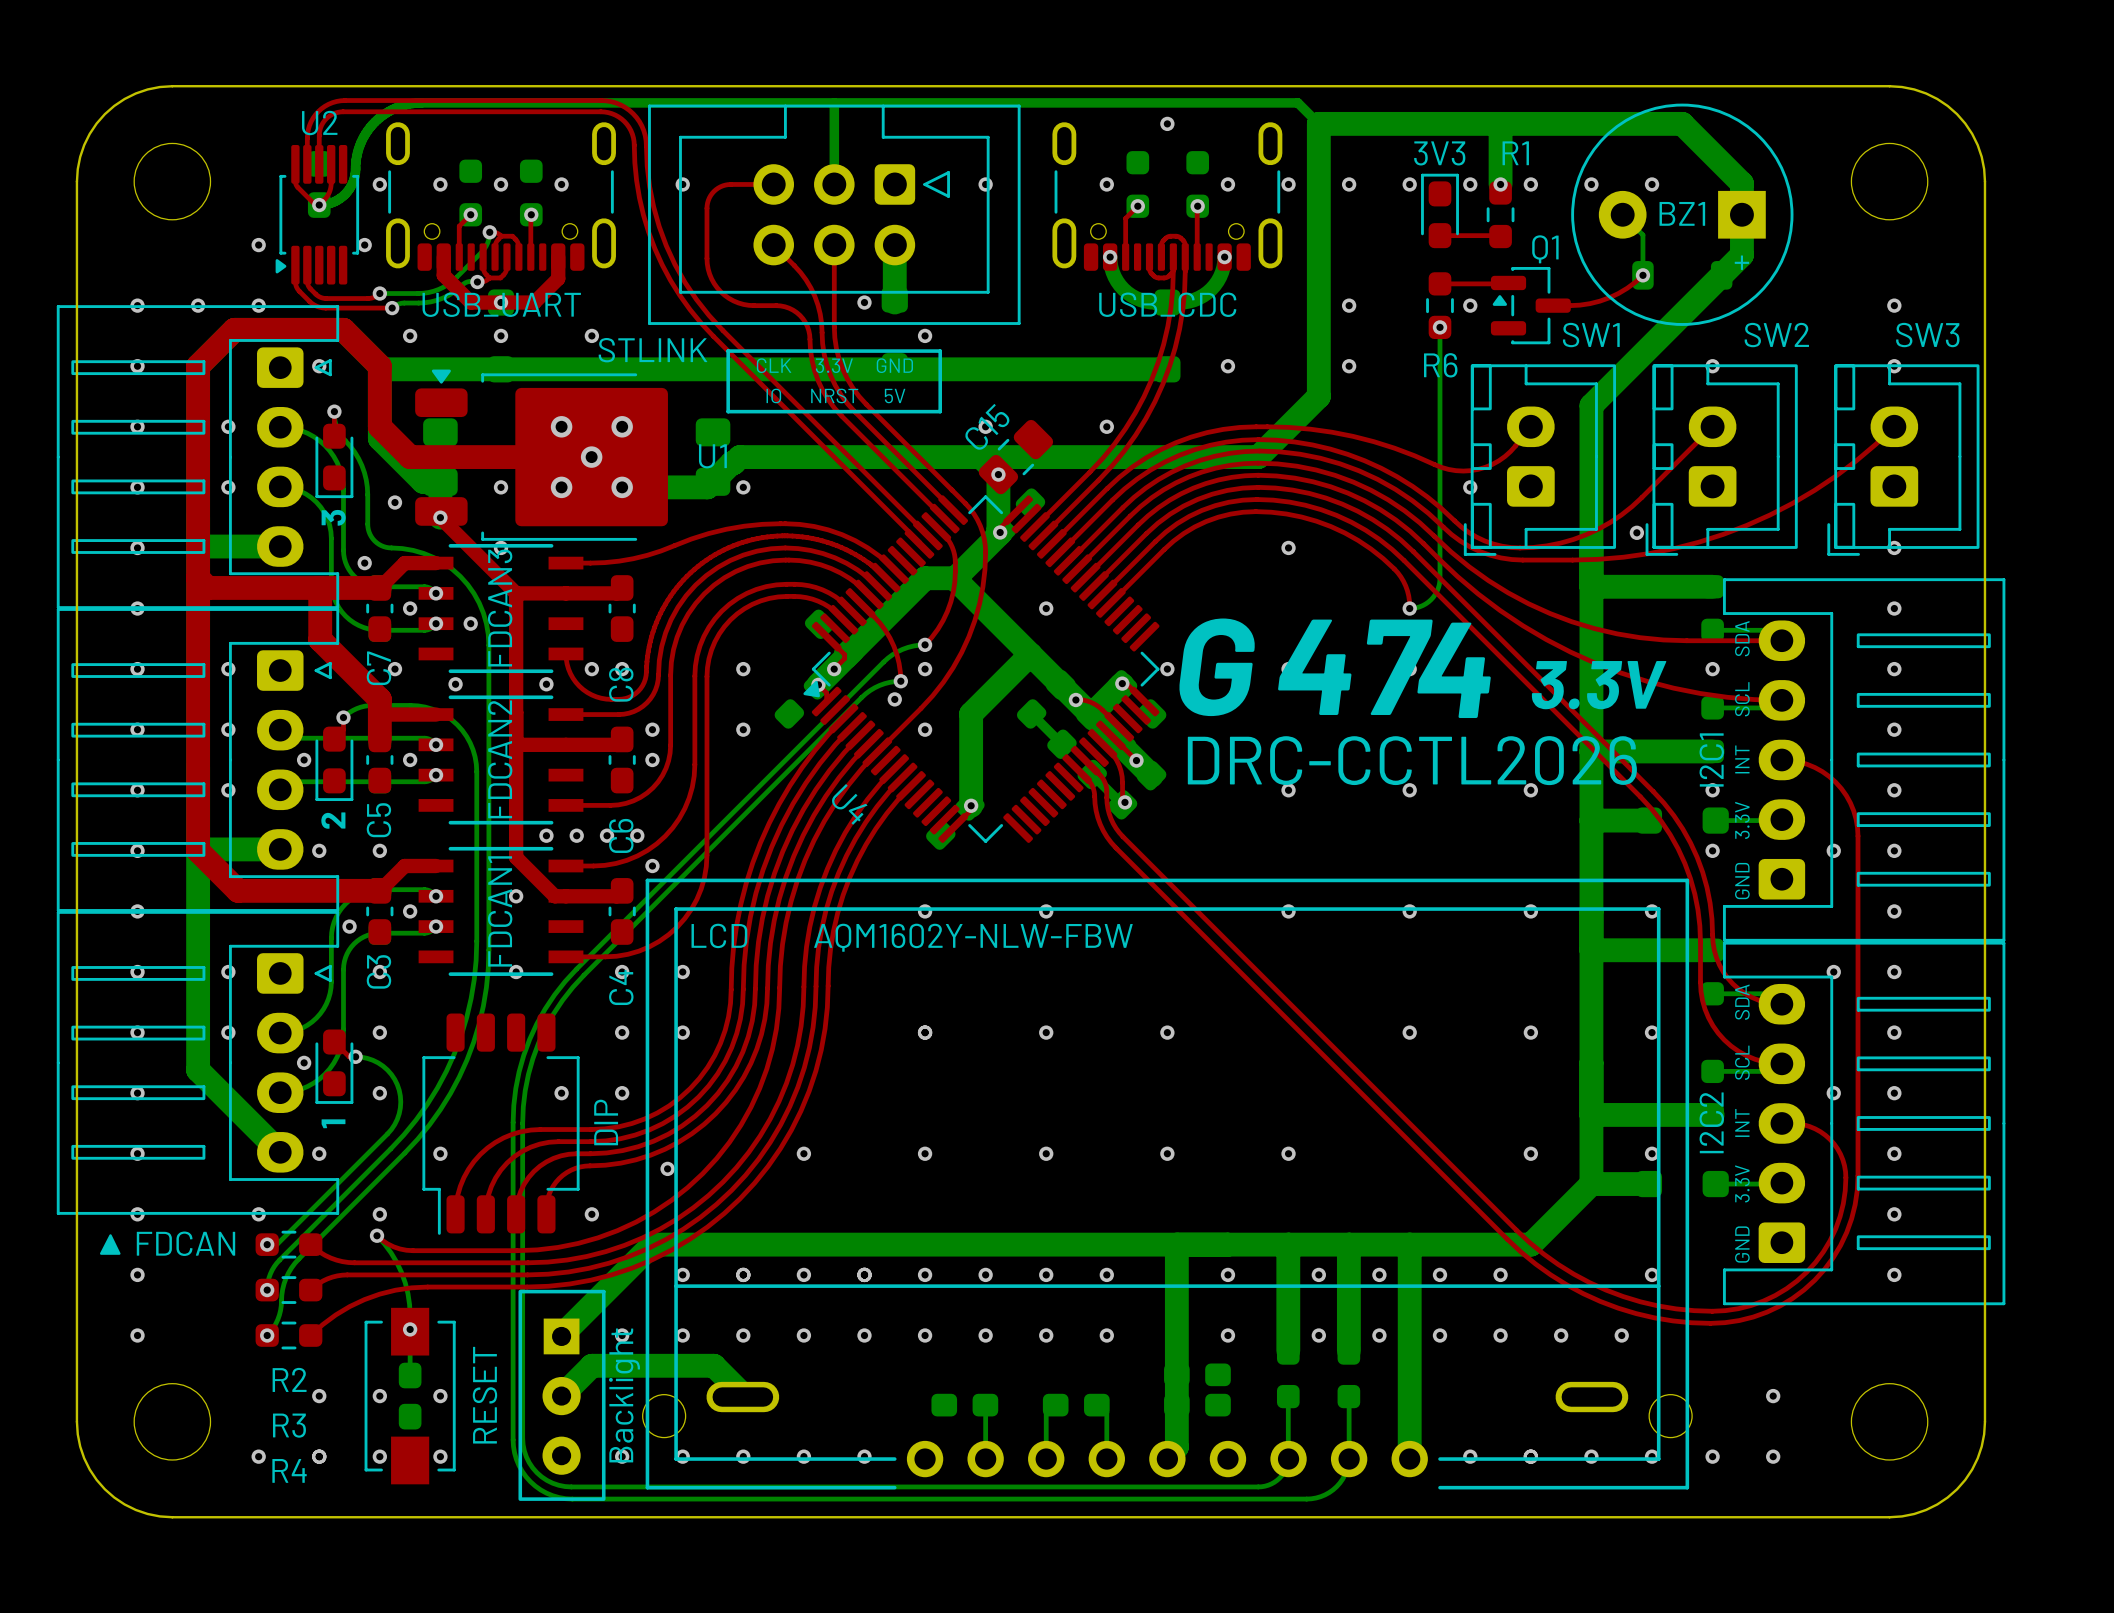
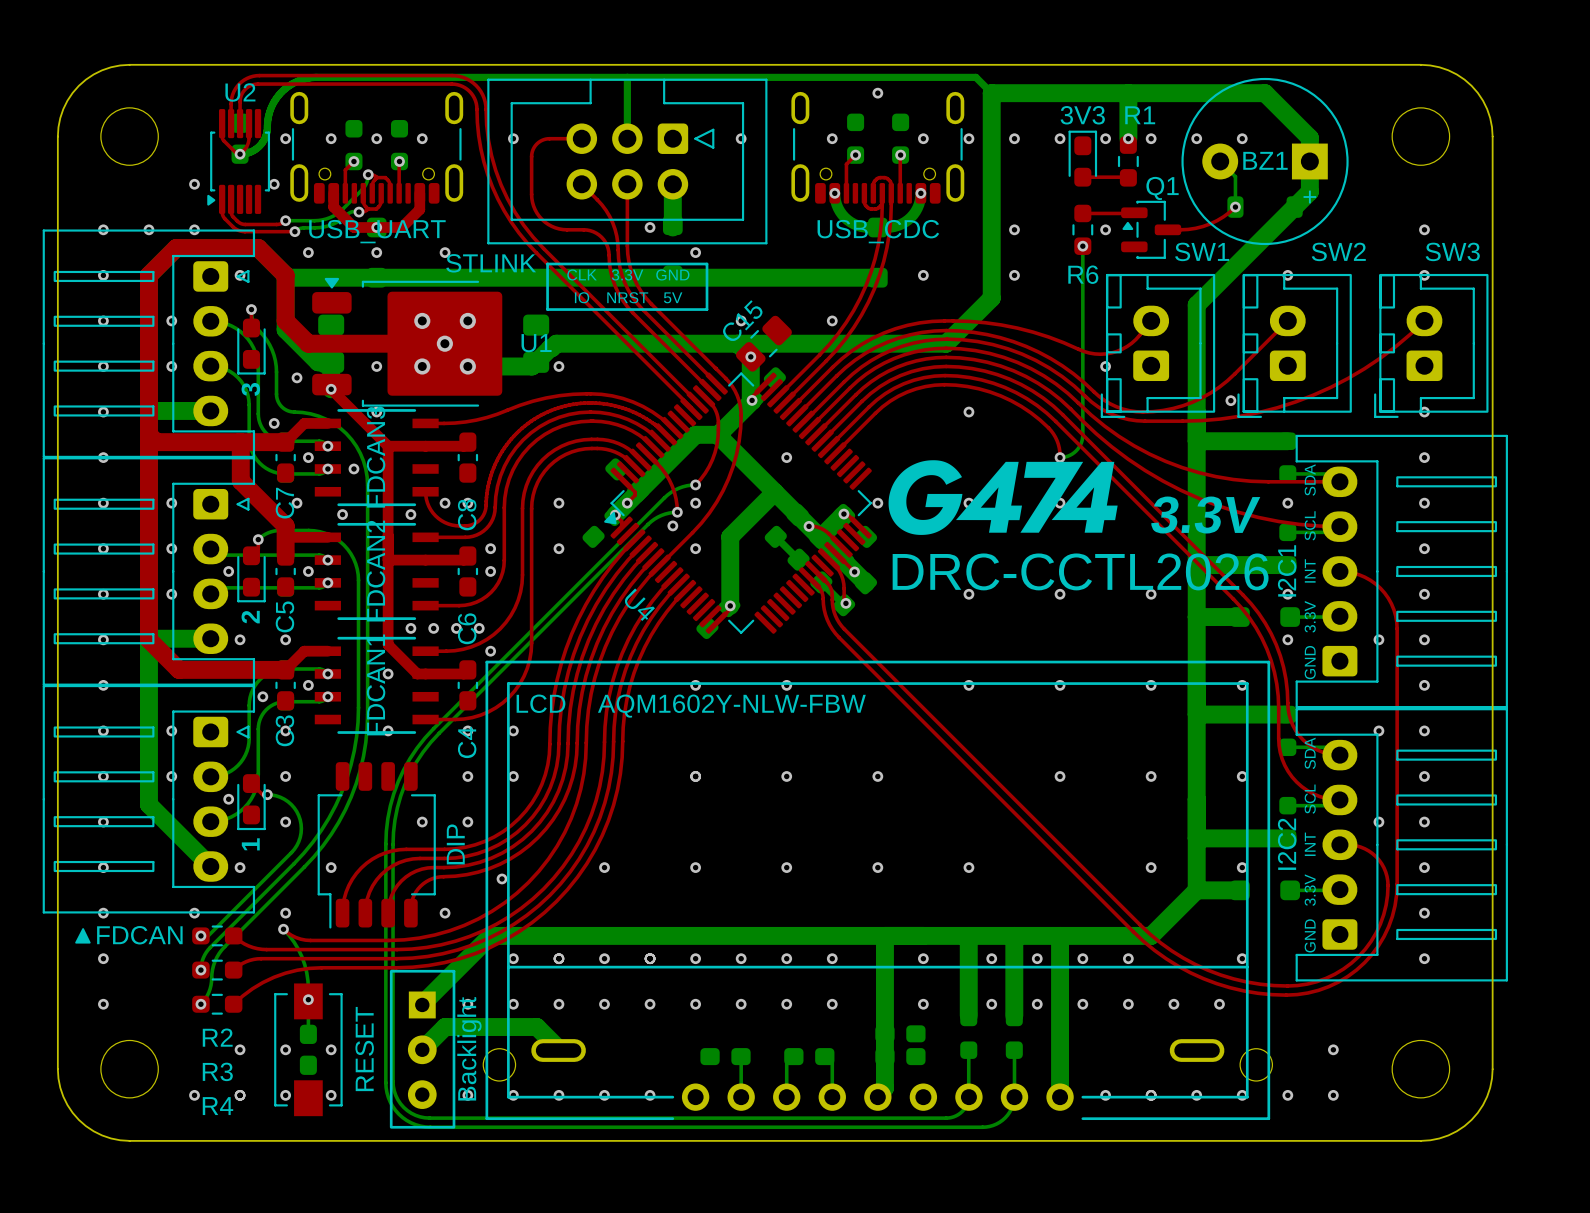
drawing: none -> [888, 460, 1118, 535]
text: G (1217, 667) -> none
text: 4 (1314, 667) -> none
text: 7 (1399, 667) -> none
text: 4 (1454, 670) -> none

